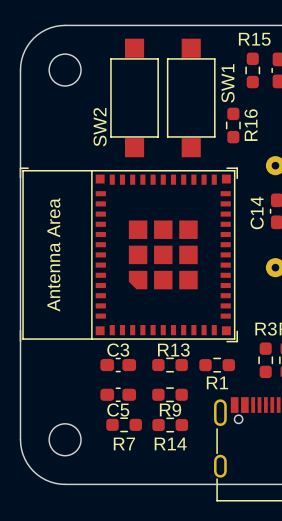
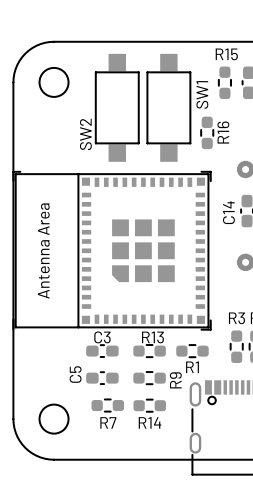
C5 name rotation: 0° (118, 409) -> 90° counterclockwise (75, 374)
C5 name position: C5 (118, 409) -> C5 (75, 374)
R9 name rotation: 0° (170, 409) -> 90° counterclockwise (175, 380)
R9 name position: R9 (170, 409) -> R9 (175, 380)

